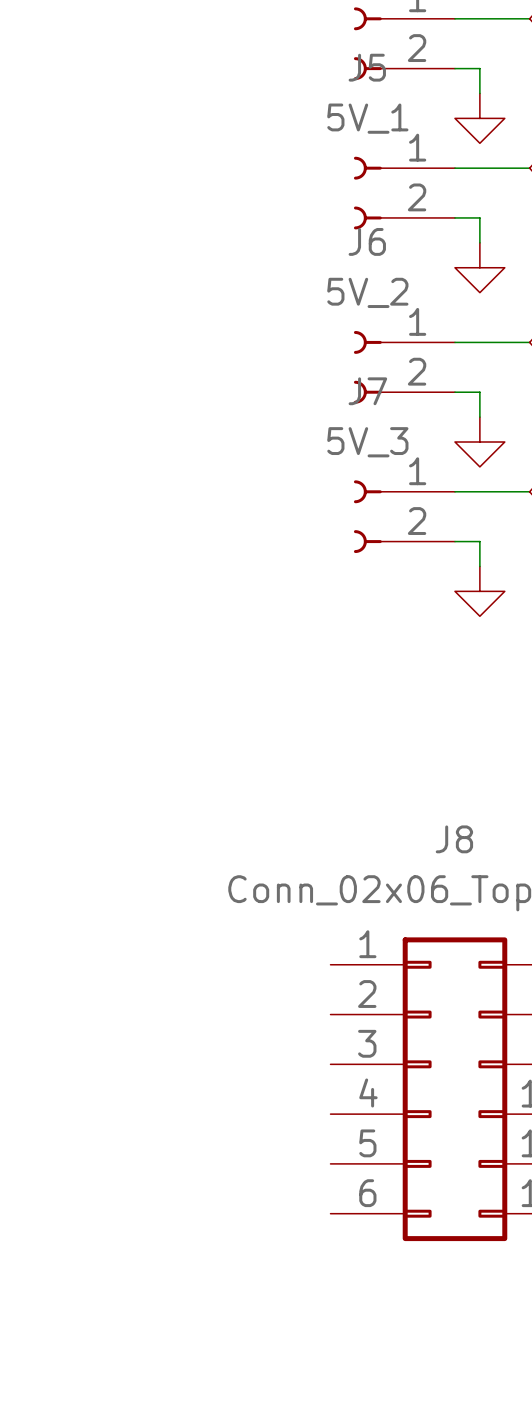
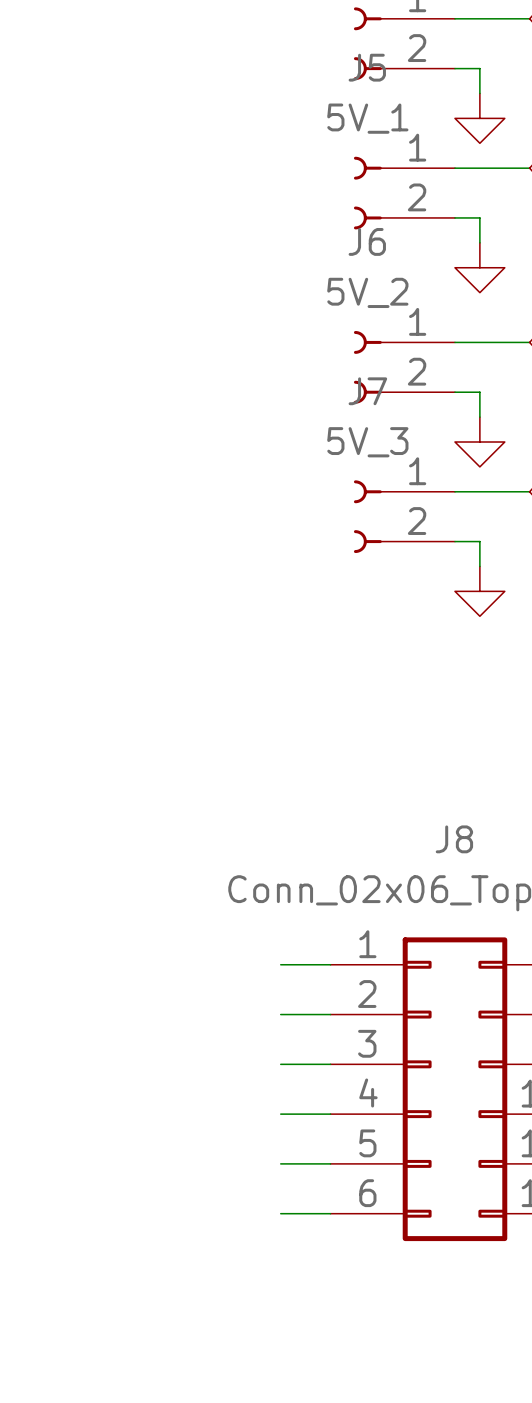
wire: none -> (280, 964) (330, 964)
wire: none -> (280, 1014) (330, 1014)
wire: none -> (280, 1064) (330, 1064)
wire: none -> (280, 1114) (330, 1114)
wire: none -> (280, 1163) (330, 1163)
wire: none -> (280, 1213) (330, 1213)

